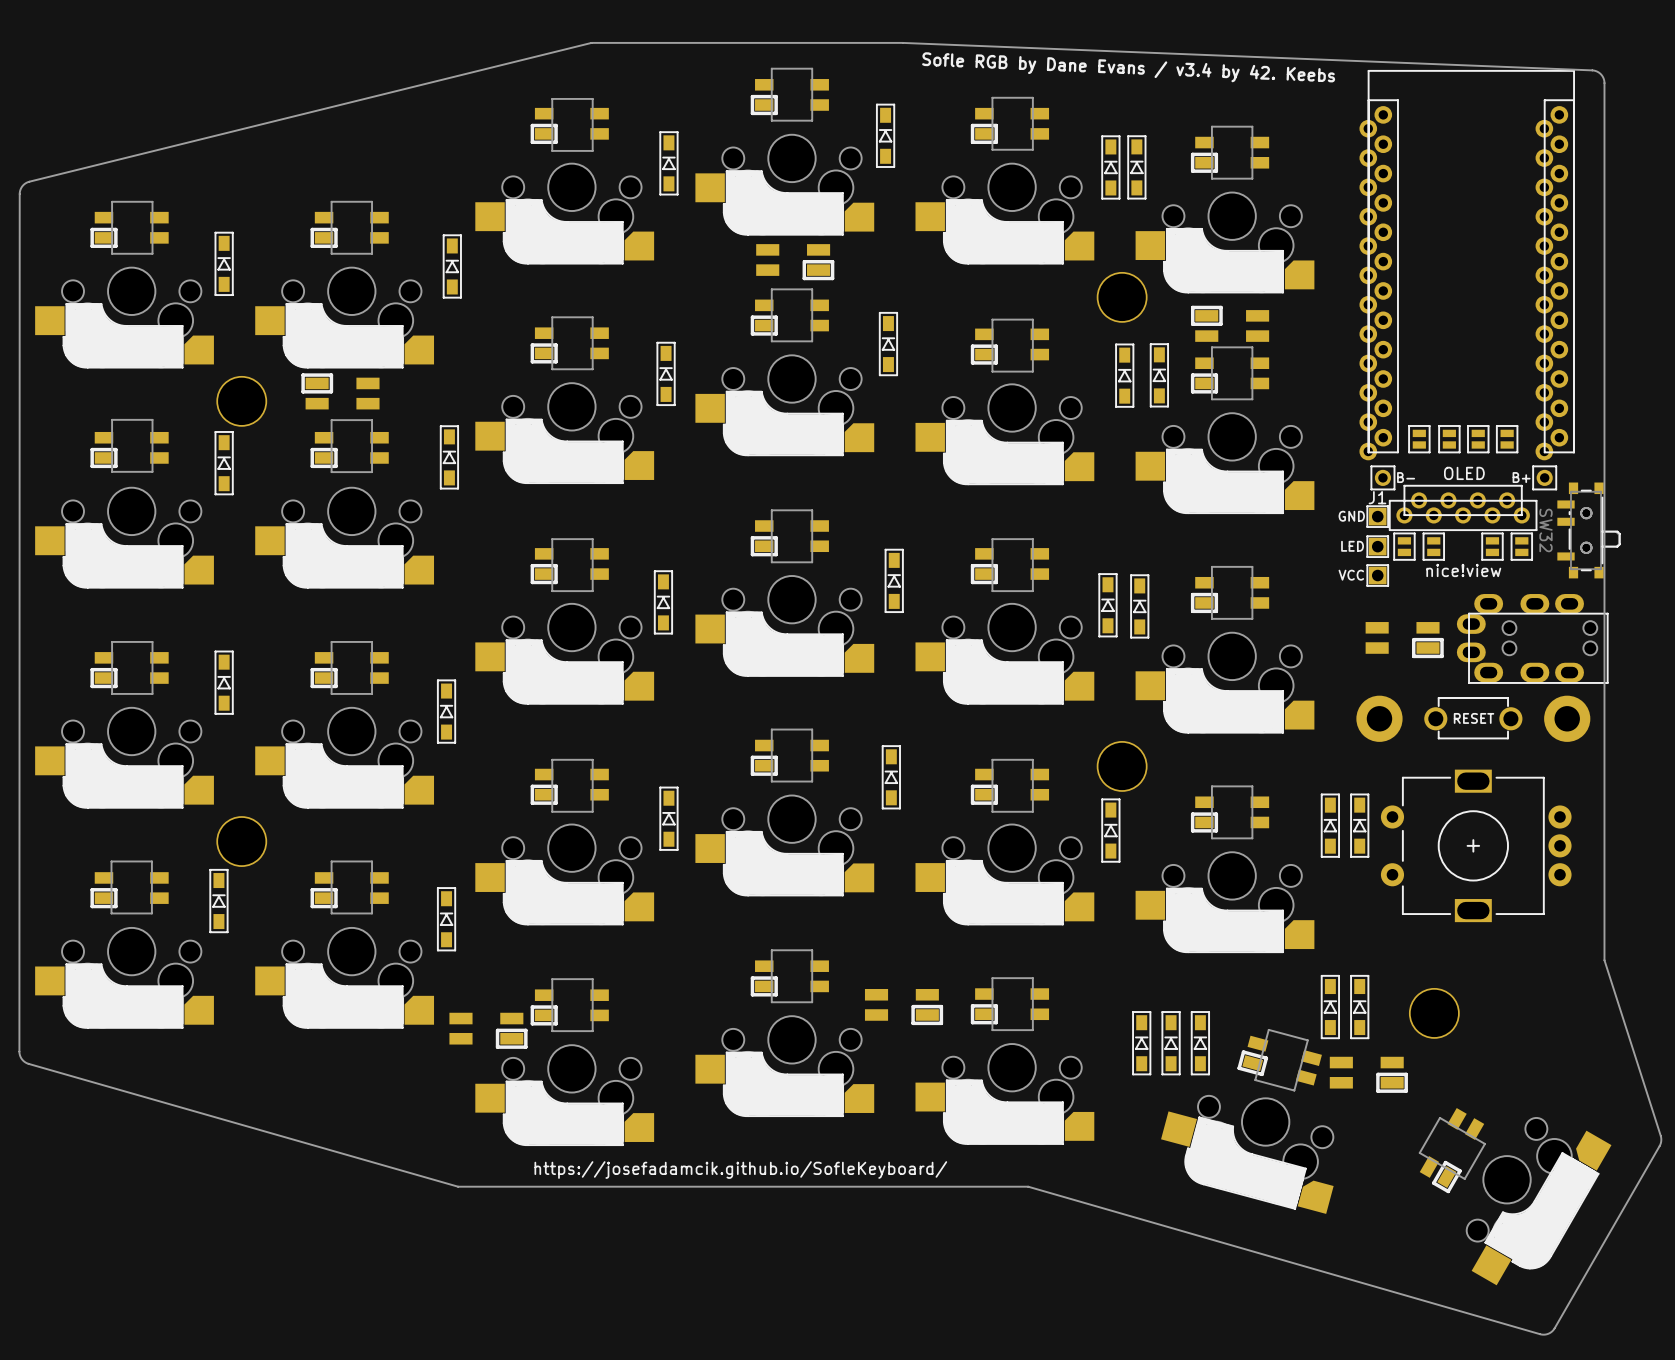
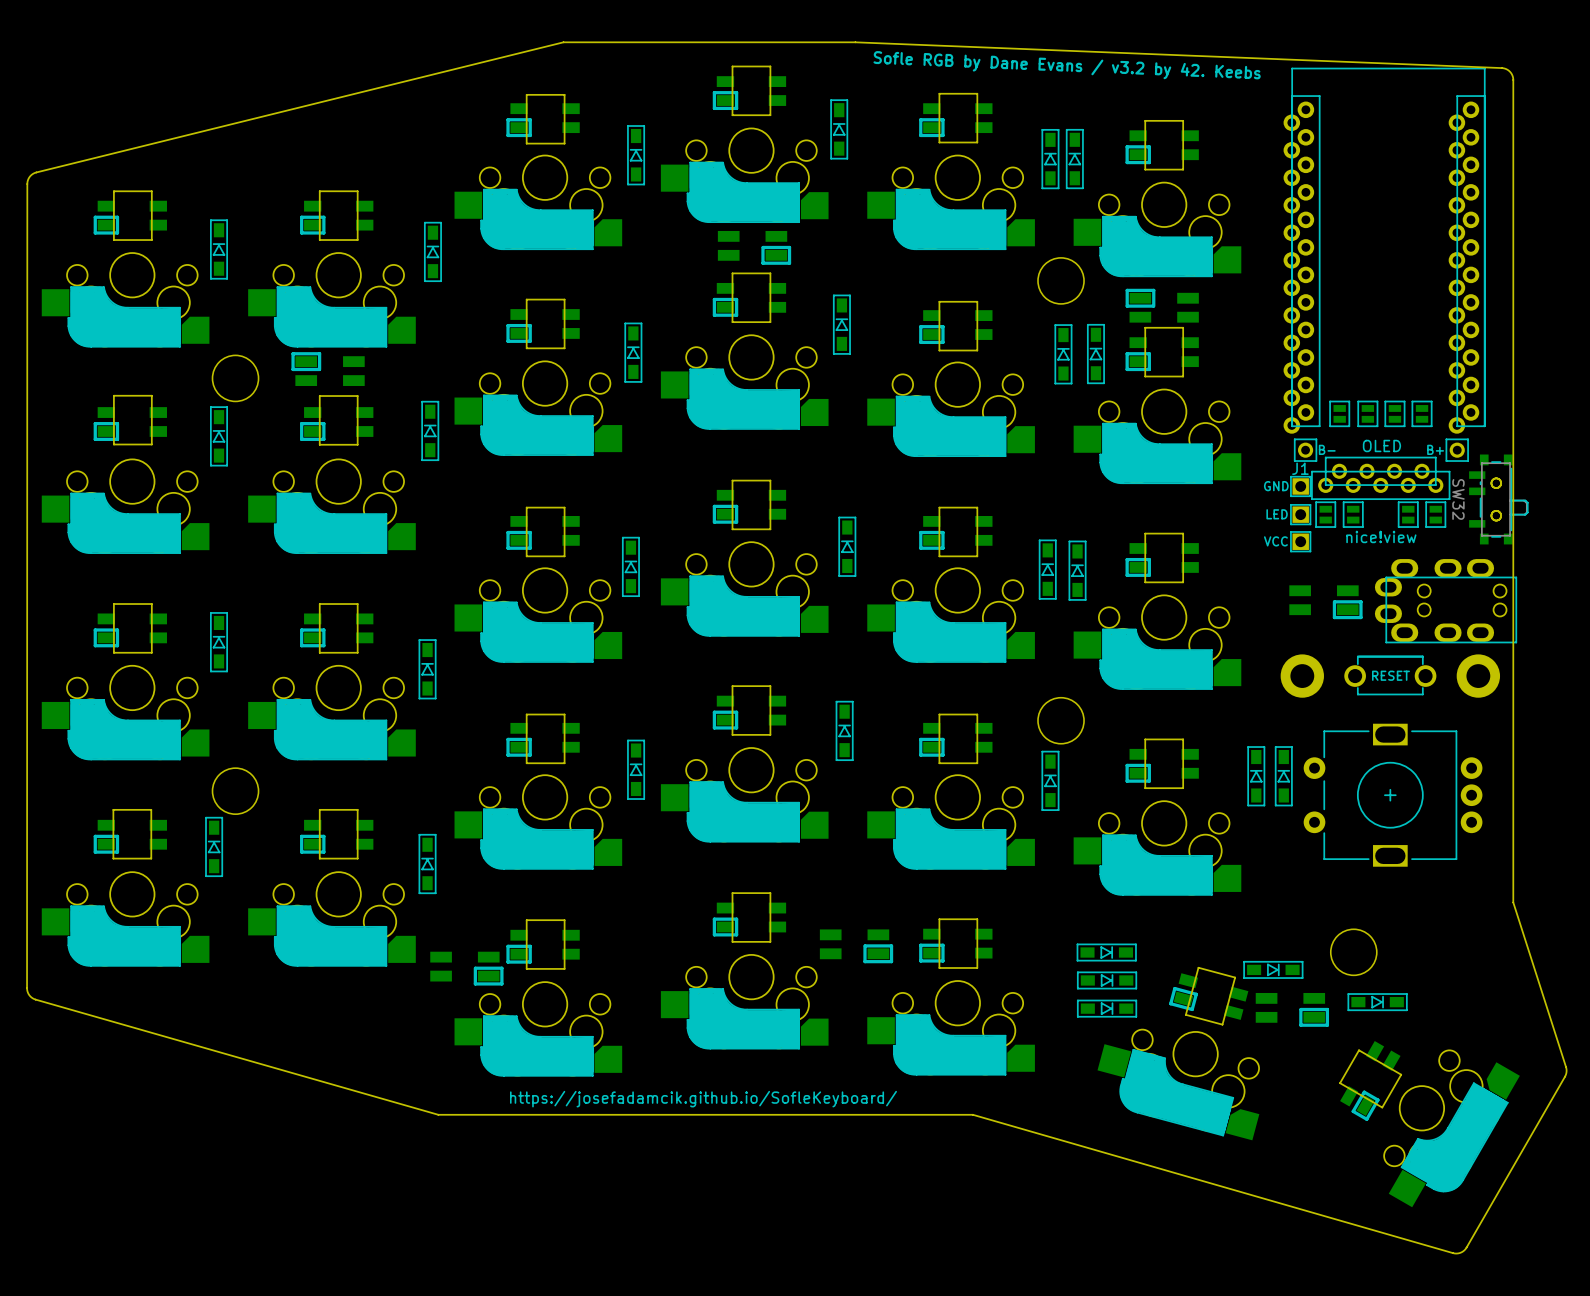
text: Sofle RGB by Dane Evans / v3.4 by 42. Keebs (1128, 67) -> Sofle RGB by Dane Evans / v3.2 by 42. Keebs (1067, 65)
part: (1330, 1007) -> none
part: (1359, 1007) -> none
part: none -> (1106, 952)
part: none -> (1273, 969)
part: (1141, 1043) -> none
part rotation: 0° (1171, 1043) -> 90° clockwise (1107, 980)
part: (1200, 1043) -> none
part: none -> (1377, 1002)
part: none -> (1107, 1008)

